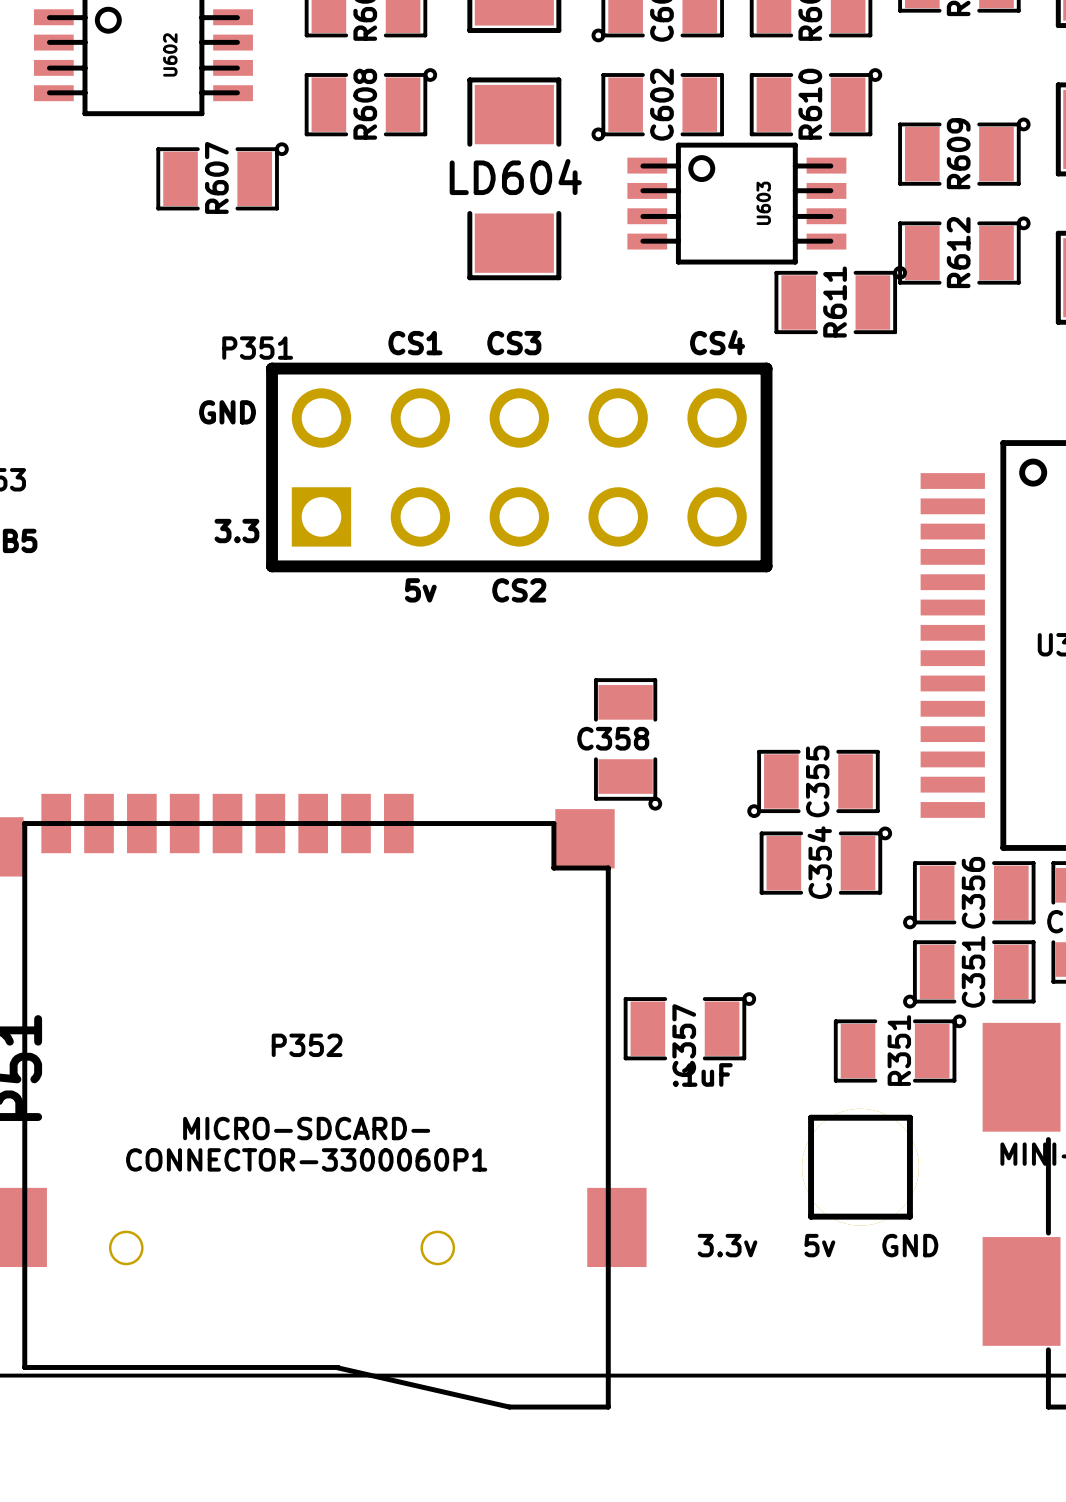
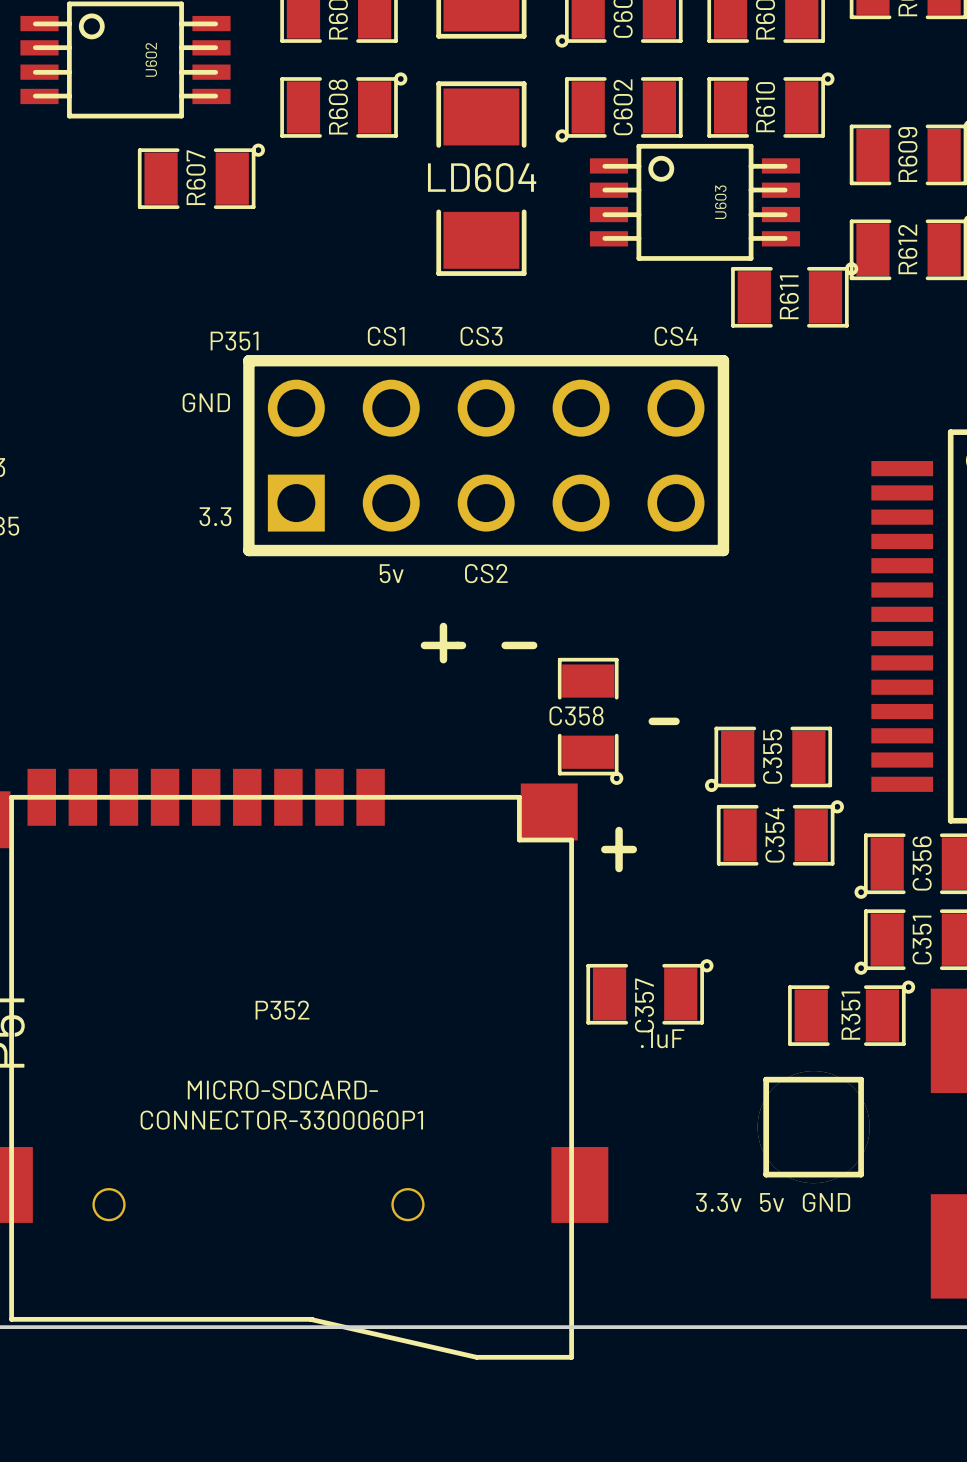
line: none -> (443, 626) (443, 659)
line: none -> (424, 645) (462, 645)
line: none -> (505, 645) (533, 645)
line: none -> (652, 721) (676, 721)
line: none -> (619, 830) (619, 868)
line: none -> (604, 849) (633, 849)

